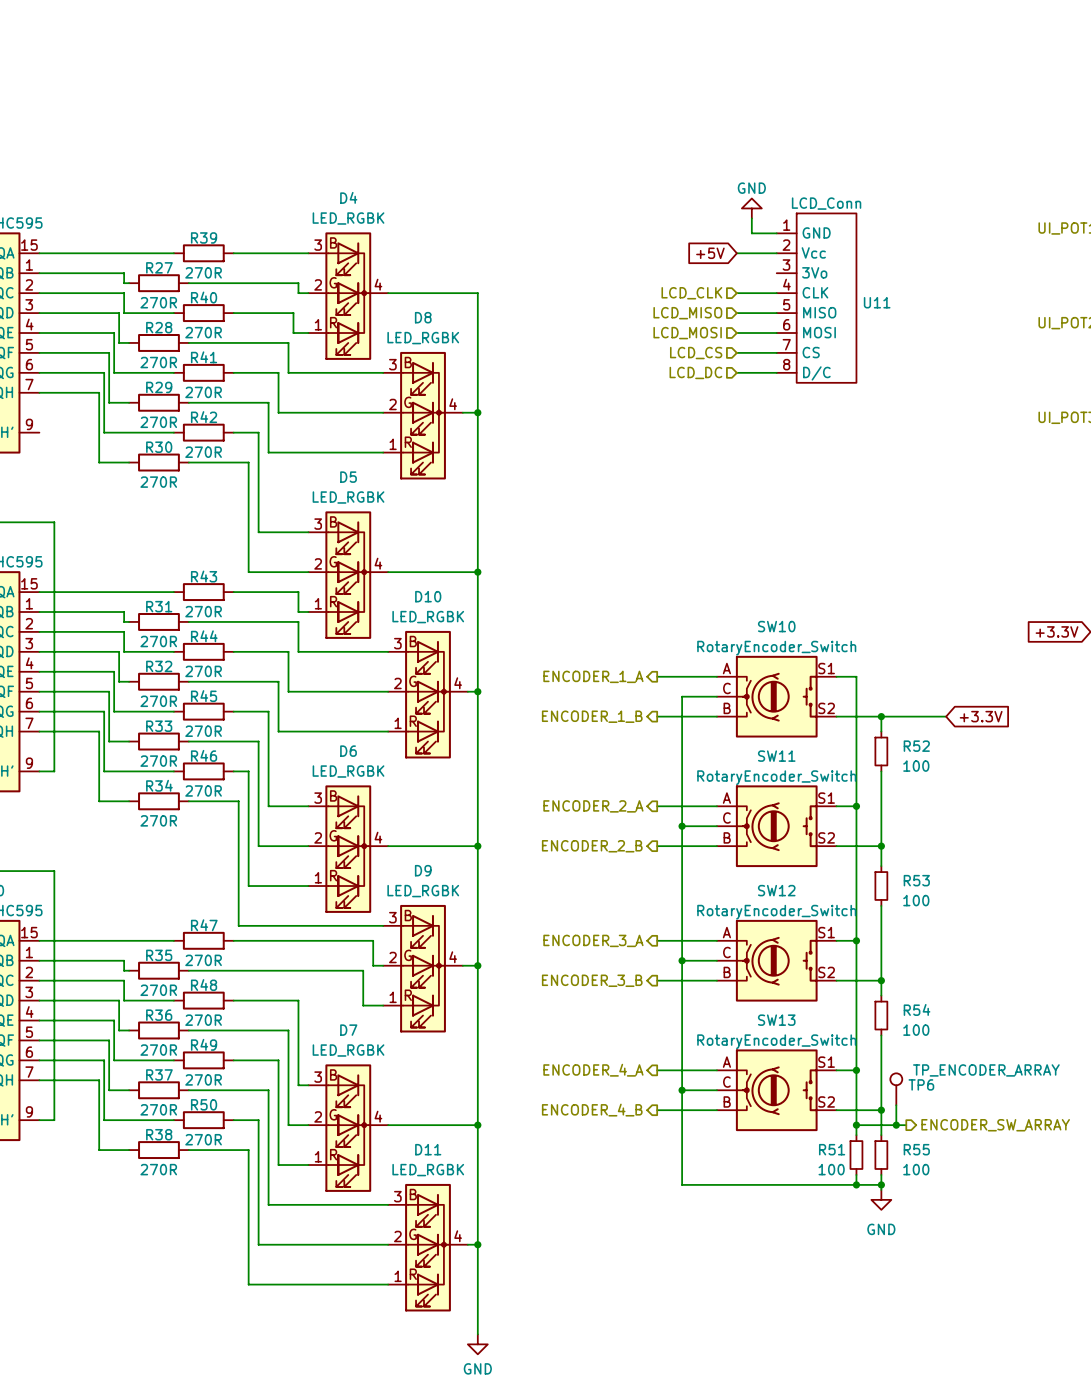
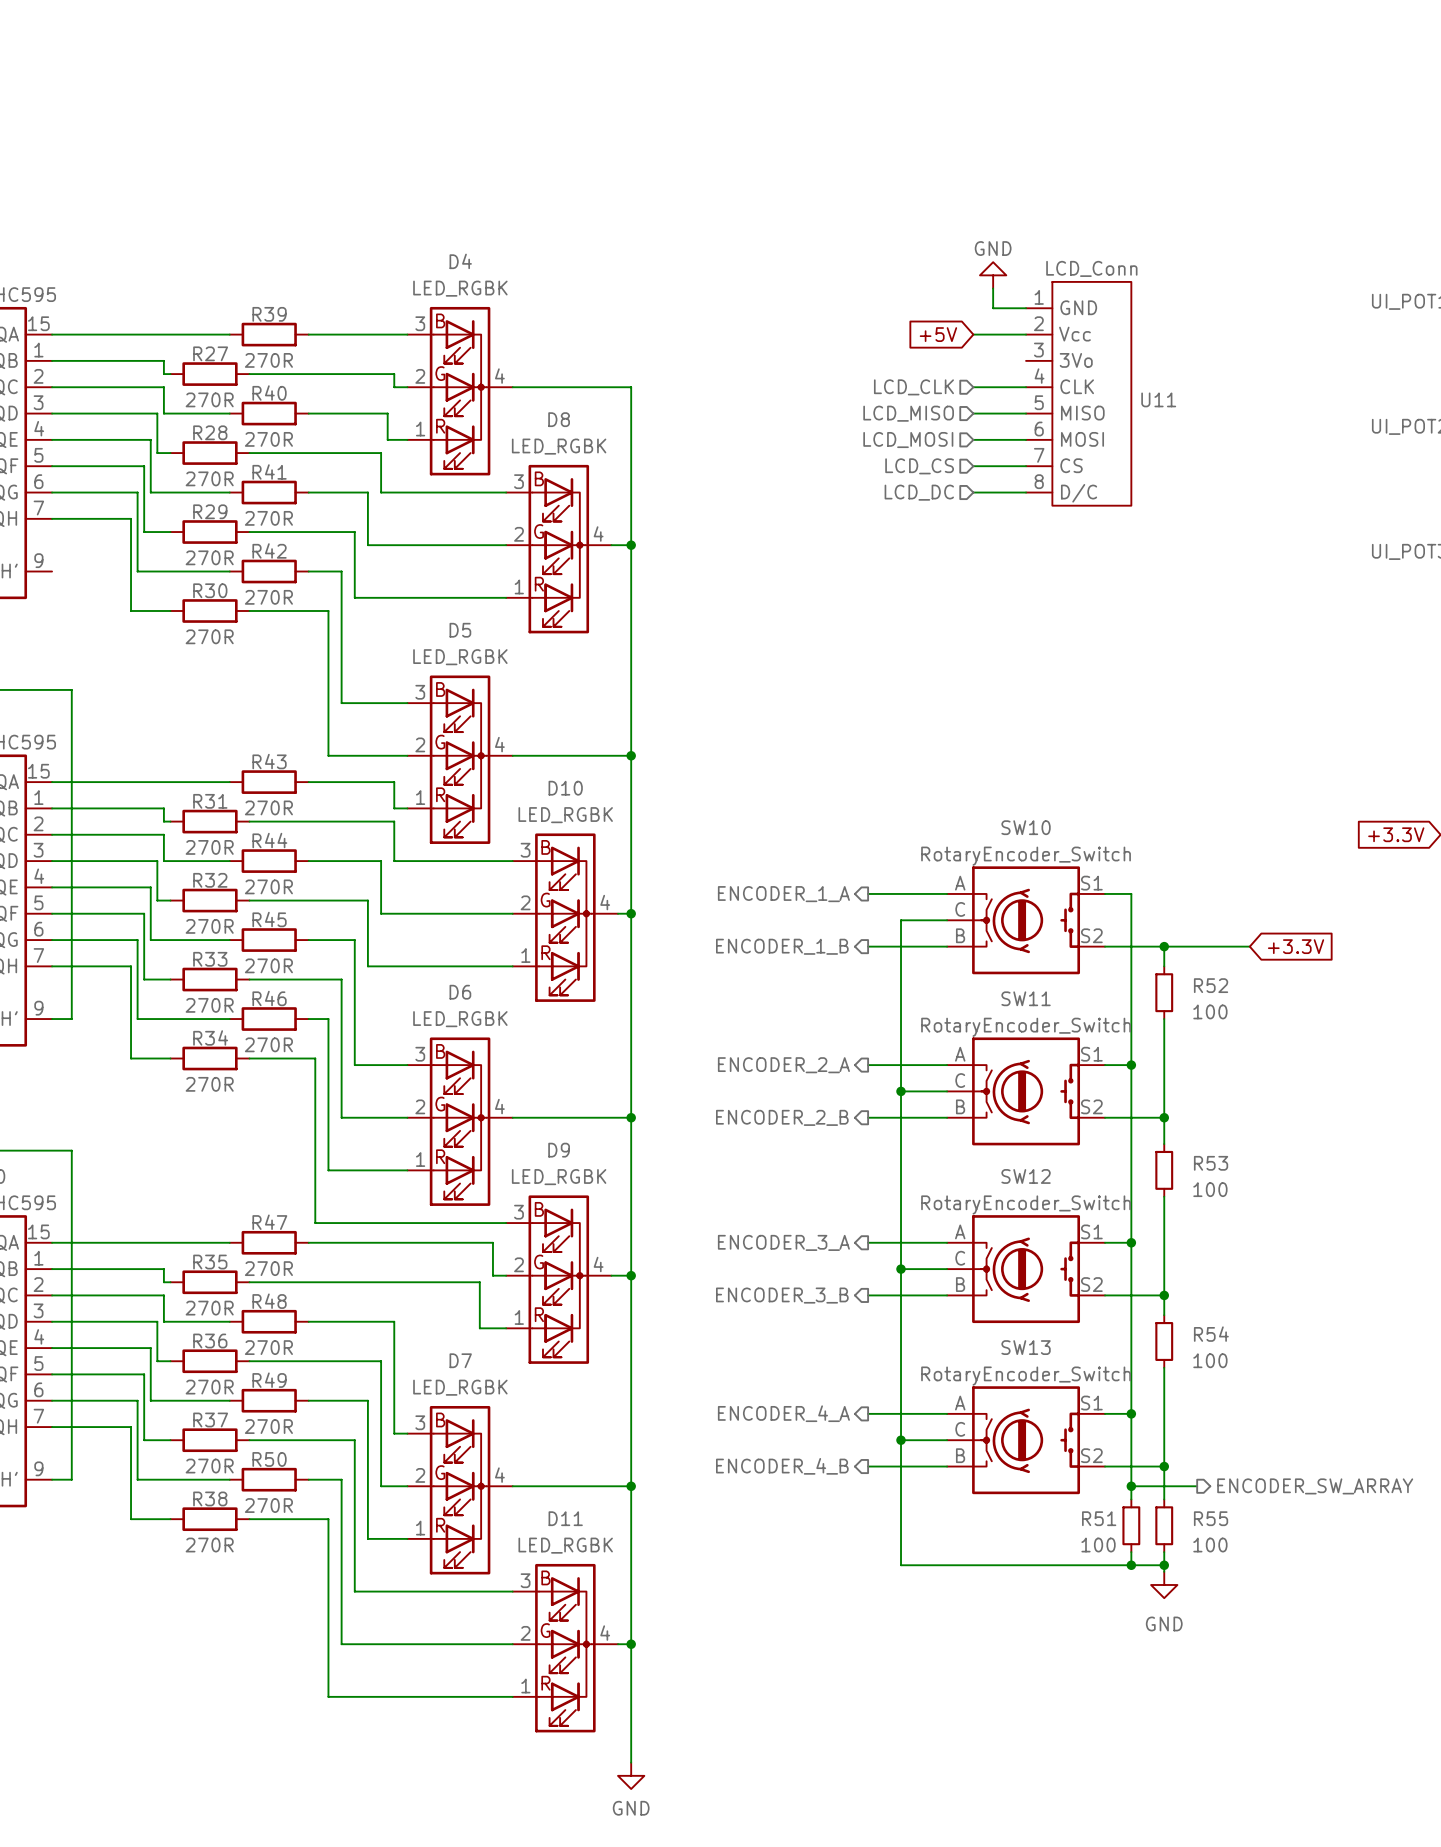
TP6: TP_ENCODER_ARRAY (896, 1089) -> none
wire: (896, 1105) (896, 1125) -> none
junction: (896, 1125) -> none

